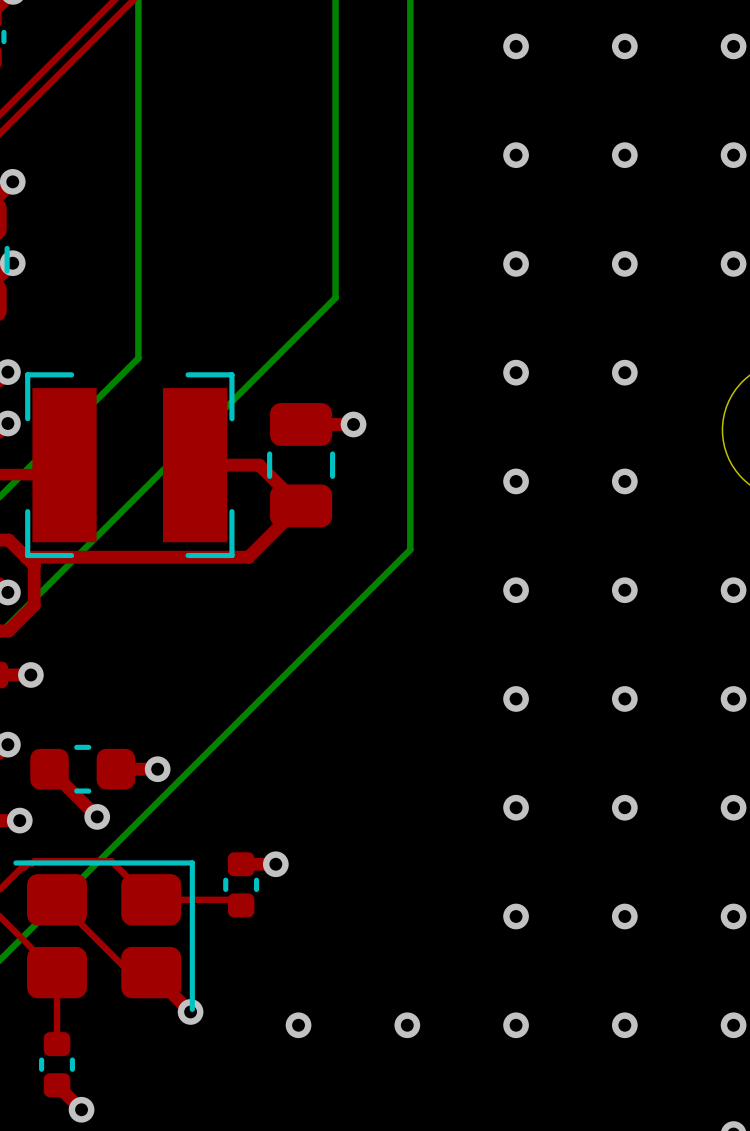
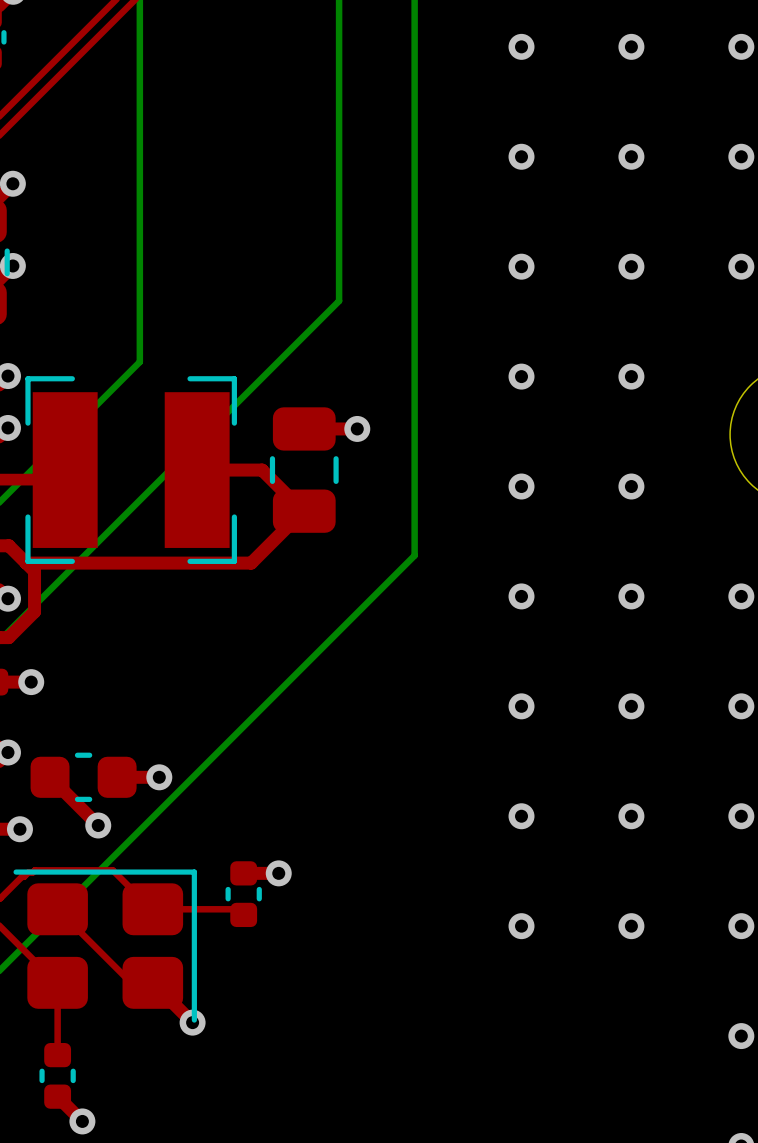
via: (298, 1025) -> none
via: (407, 1025) -> none
via: (516, 1025) -> none
via: (624, 1025) -> none

